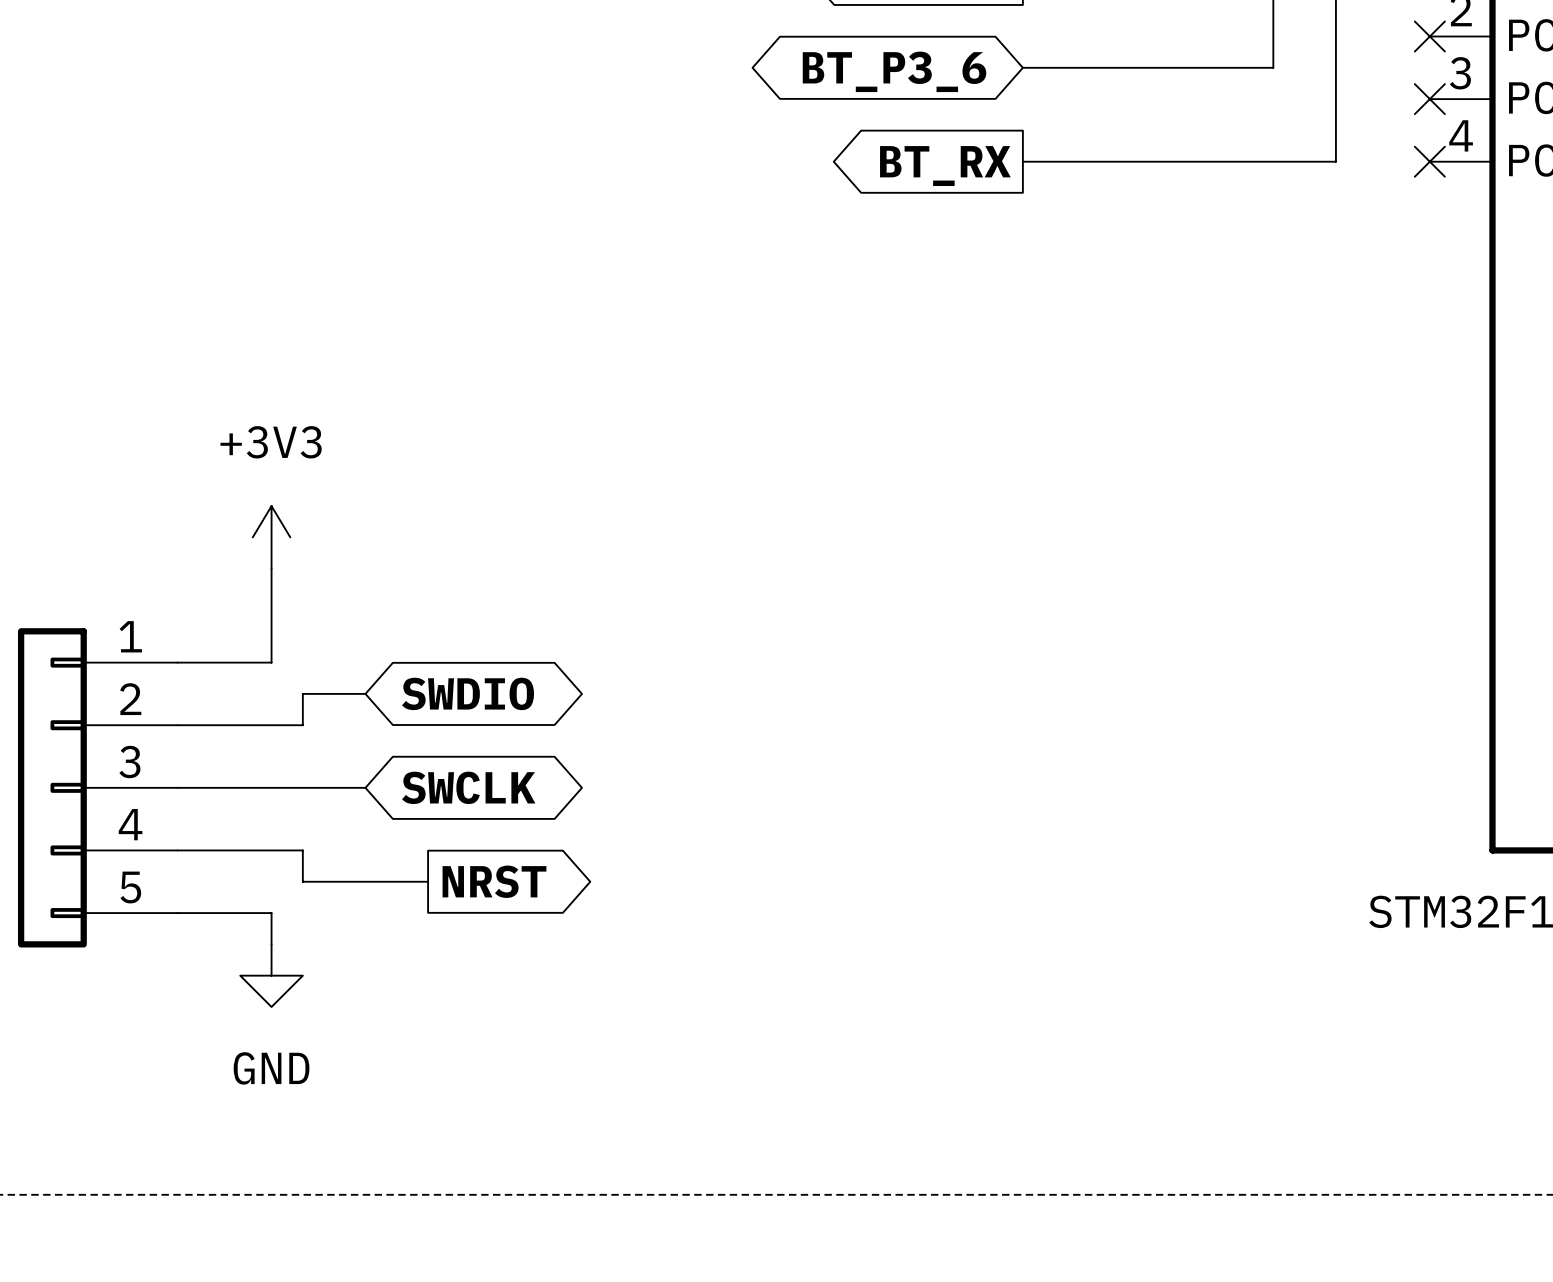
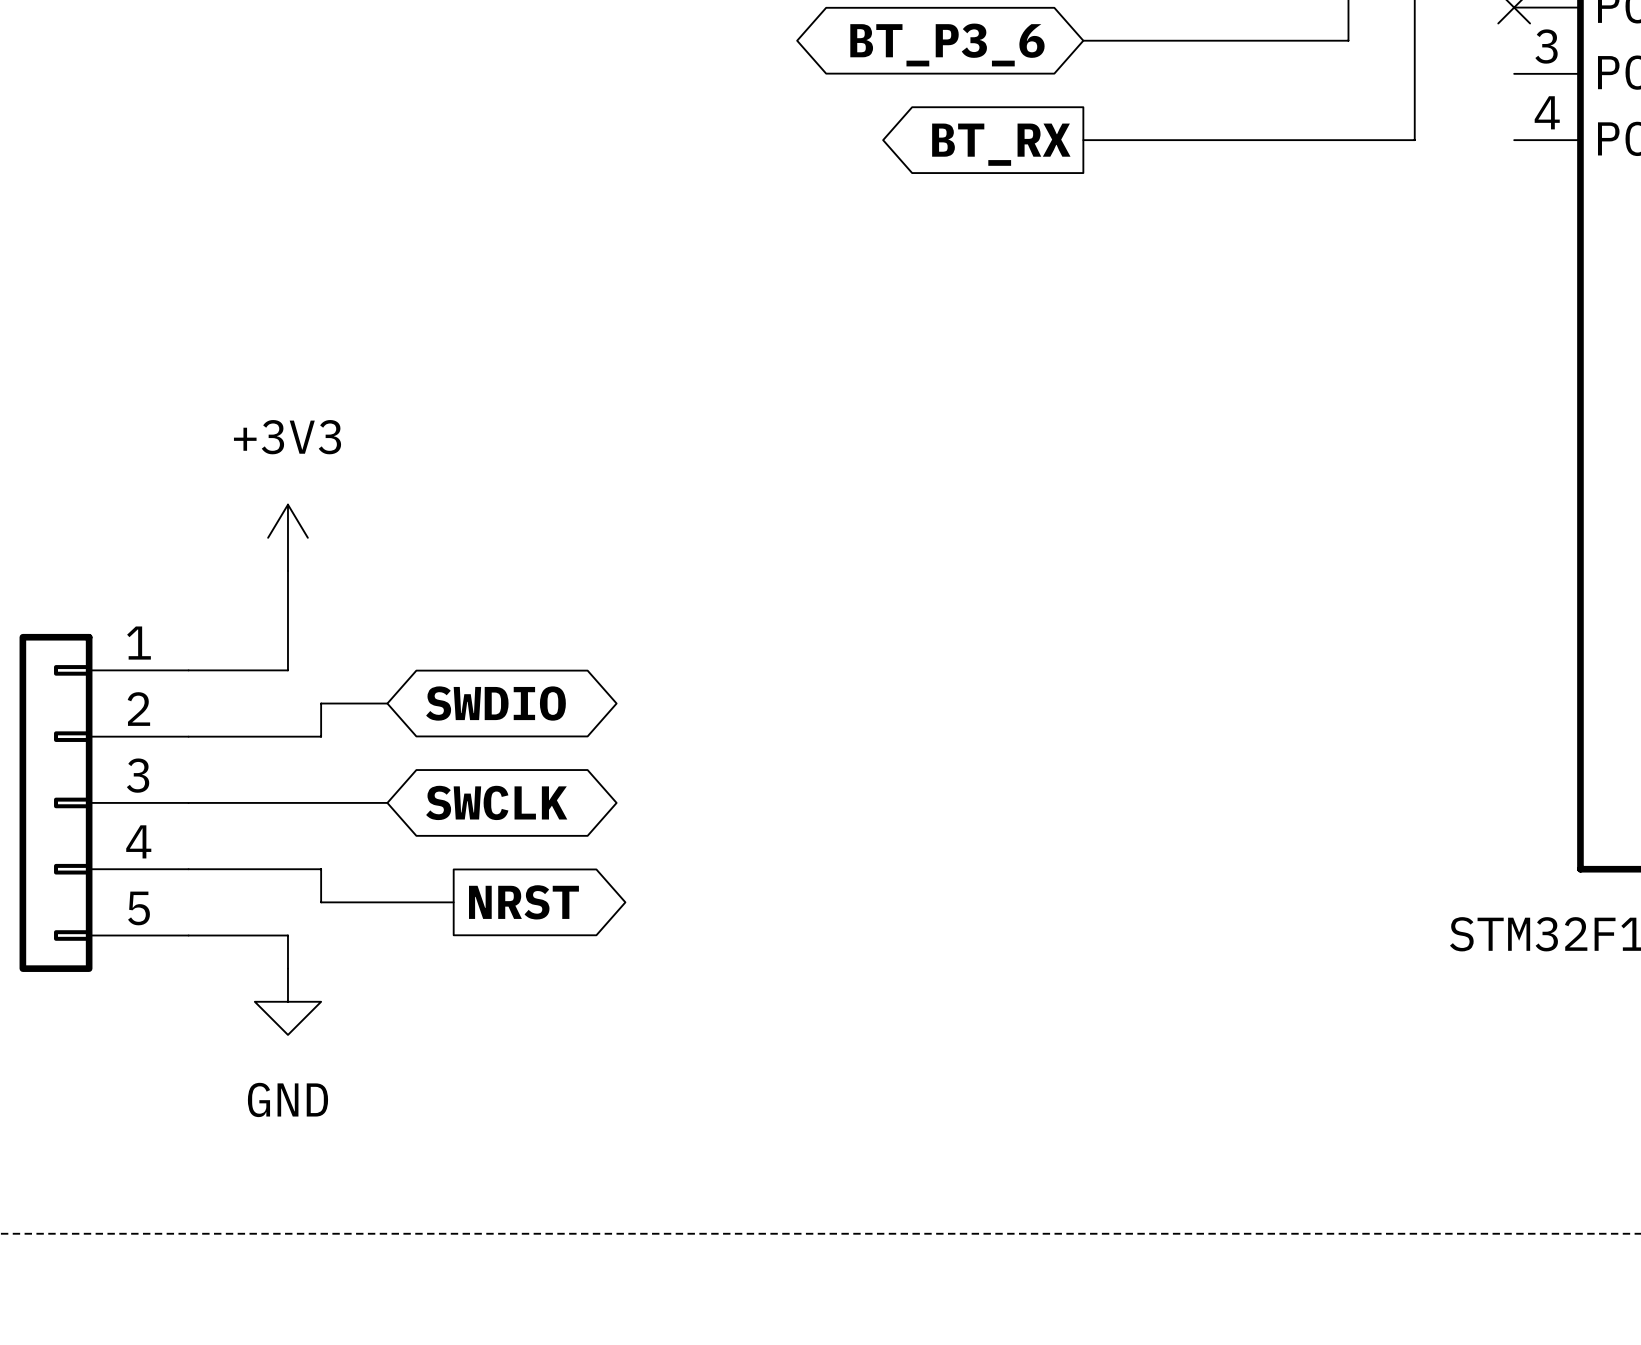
no-connect mark: (1429, 99) -> none
no-connect mark: (1429, 161) -> none

